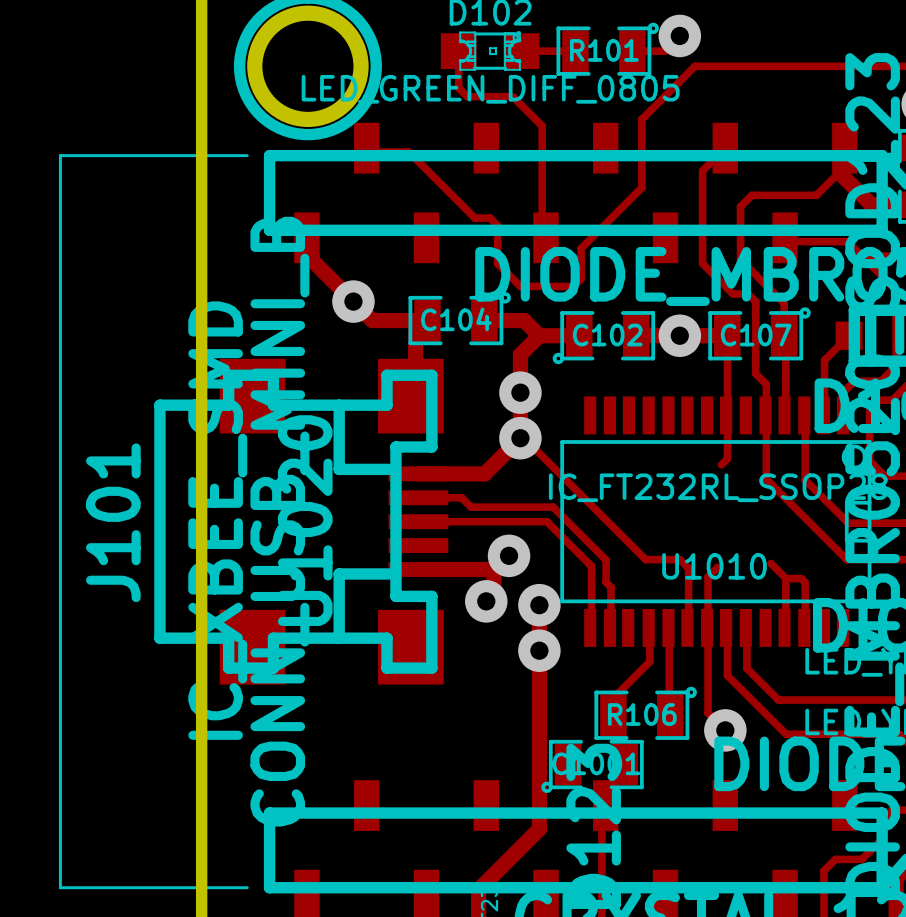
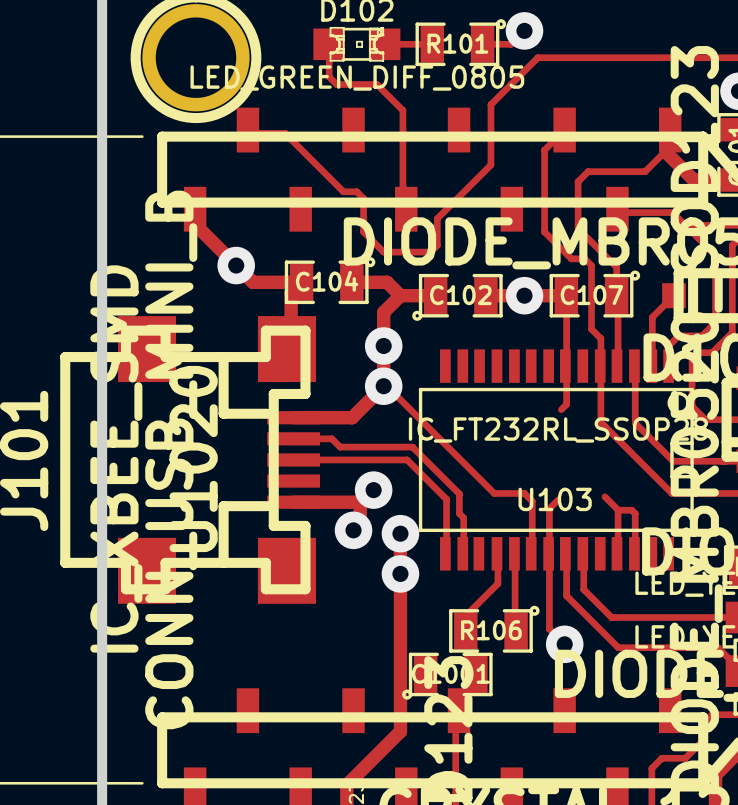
U1010 name: U1010 (714, 566) -> U103 (555, 499)

